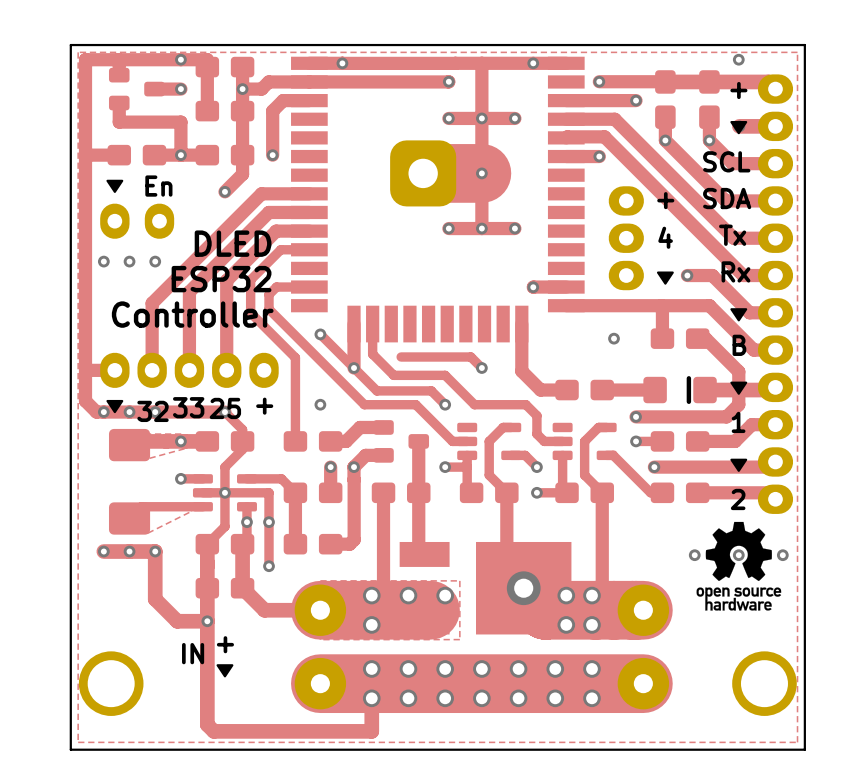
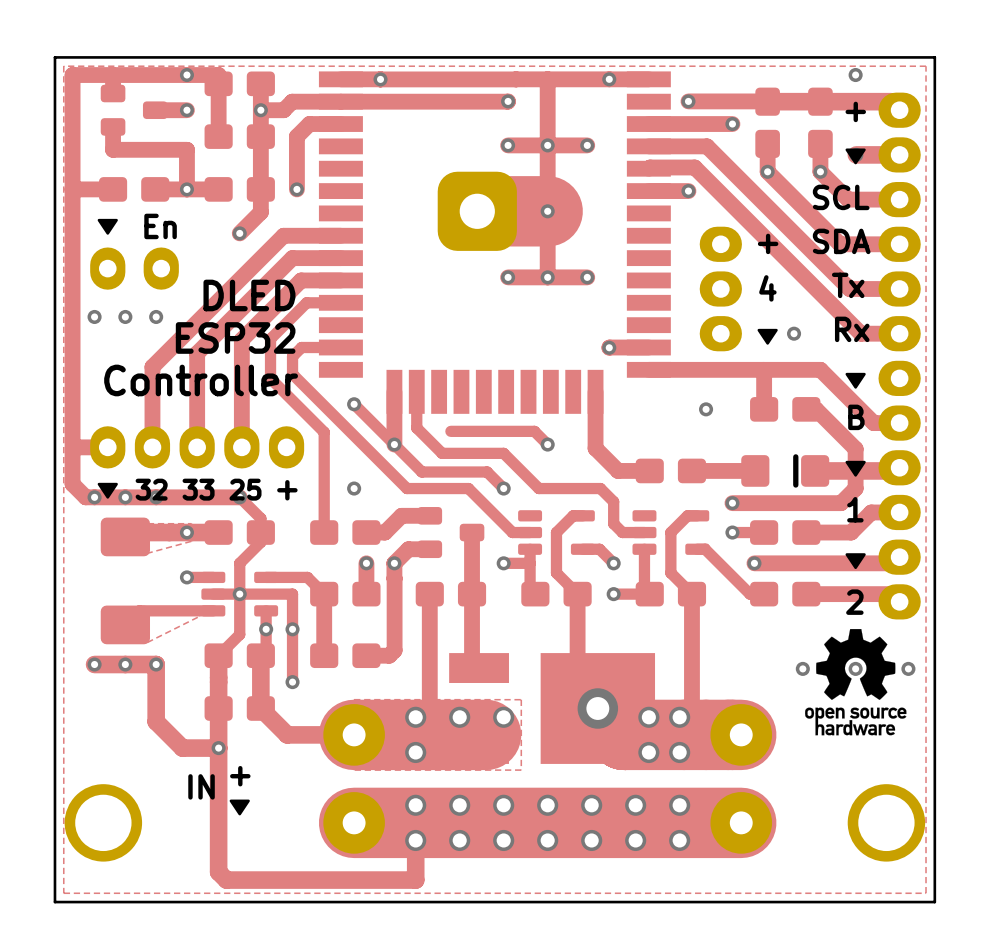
track: (687, 275) (712, 275) (749, 312) (775, 312) -> none
text: 33 (188, 407) -> none
text: 25 (225, 408) -> none
text: 32 (153, 411) -> 32 33 25 (198, 489)

